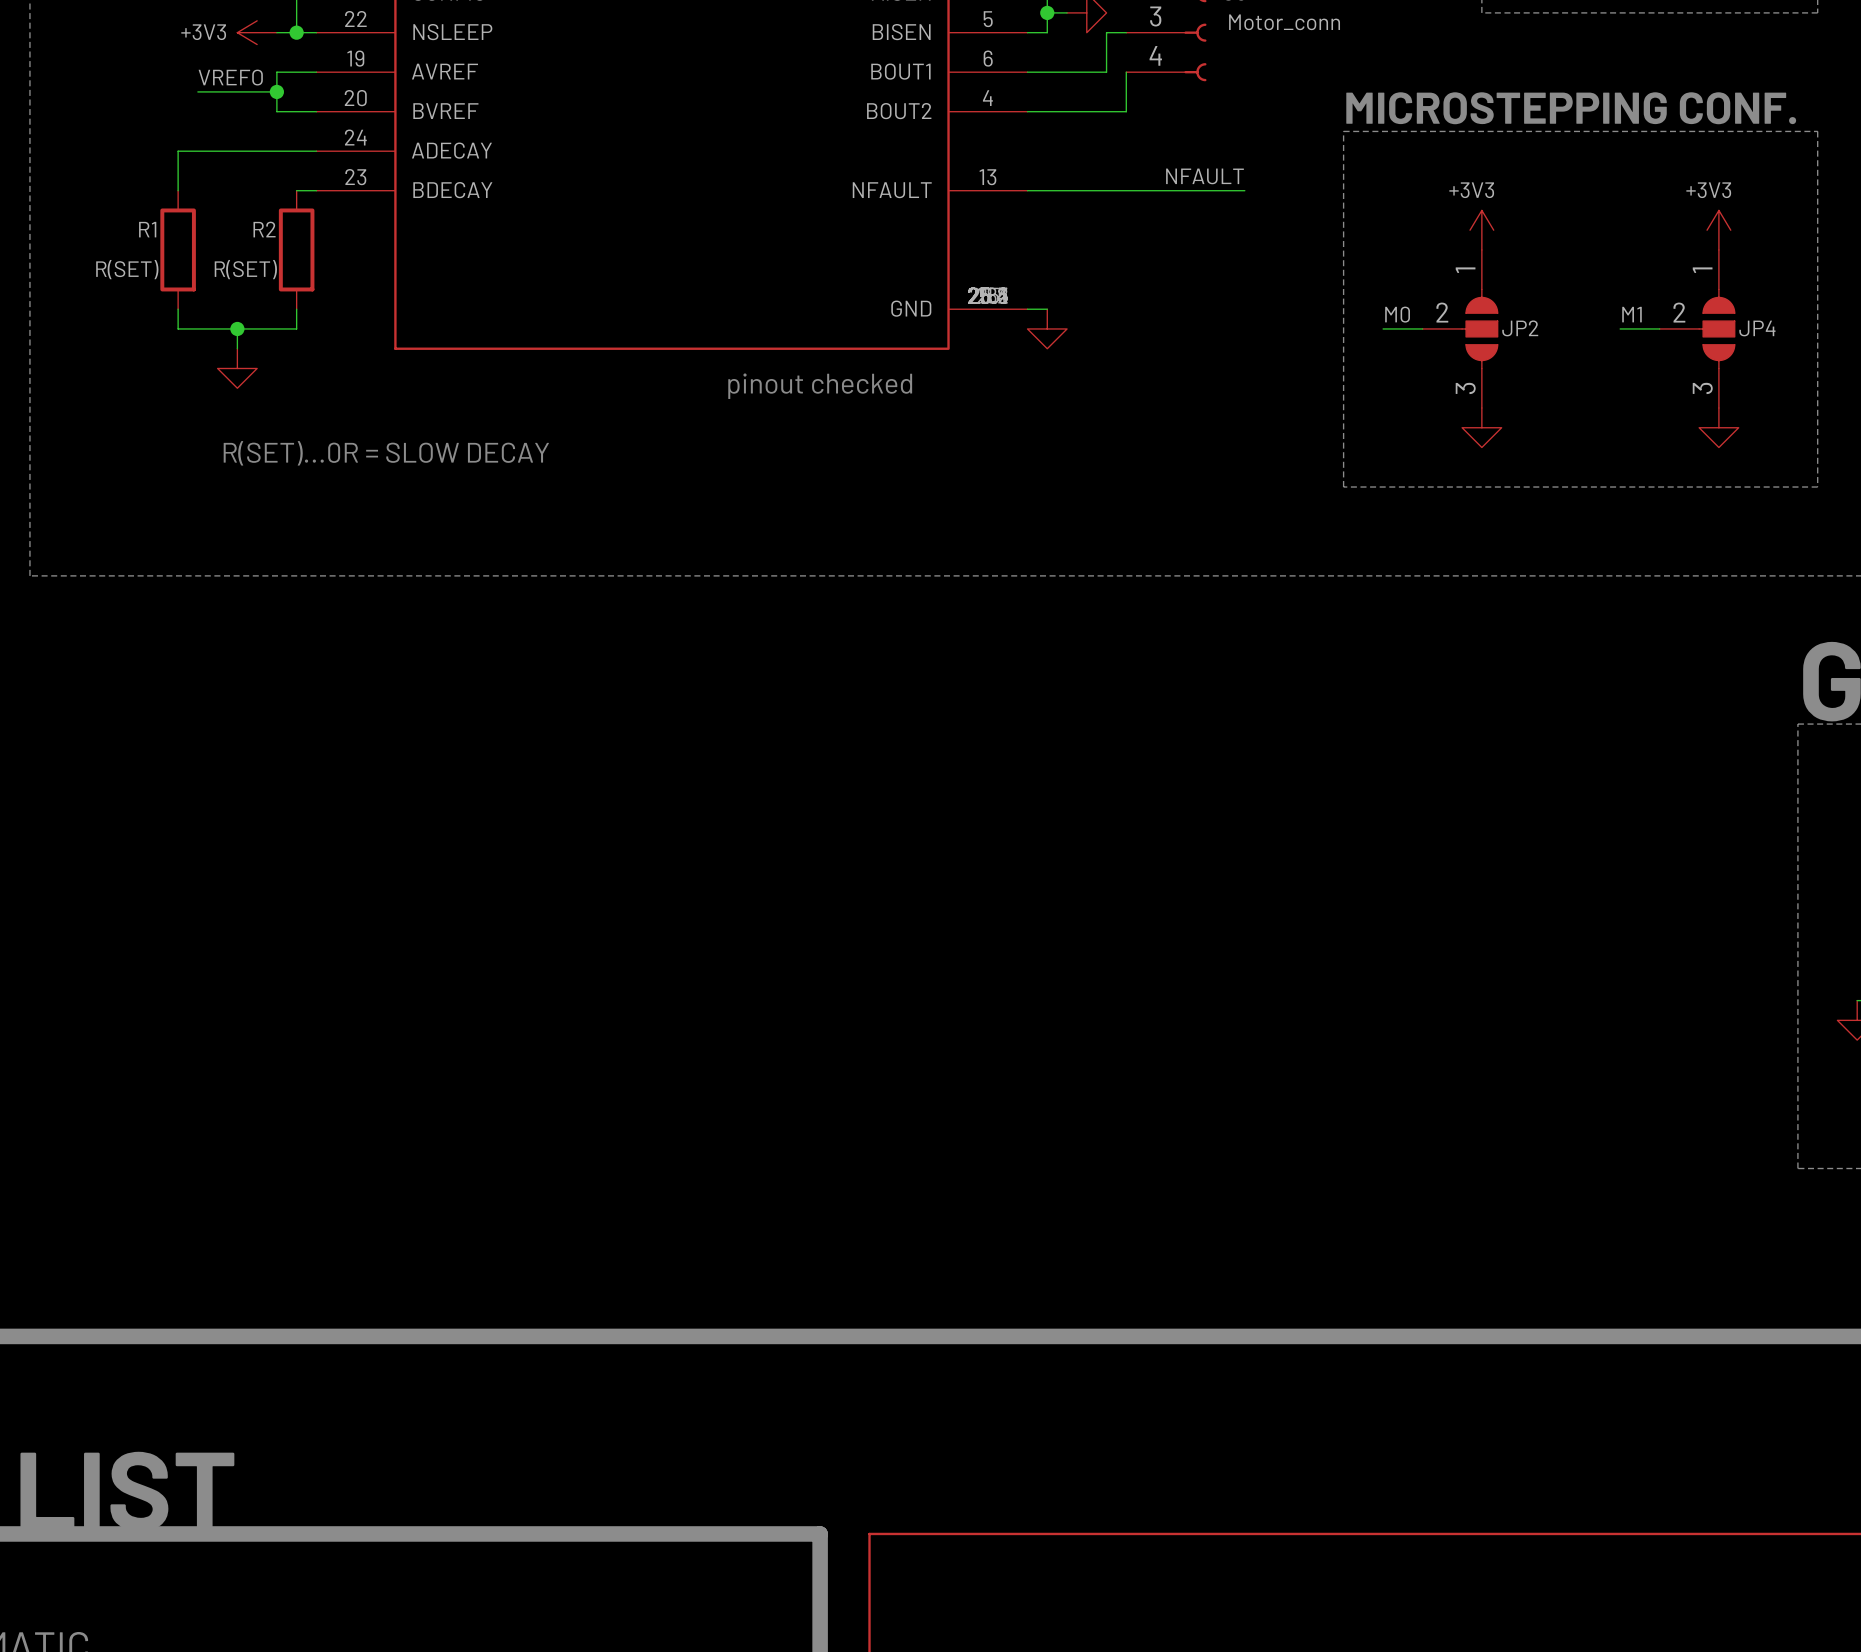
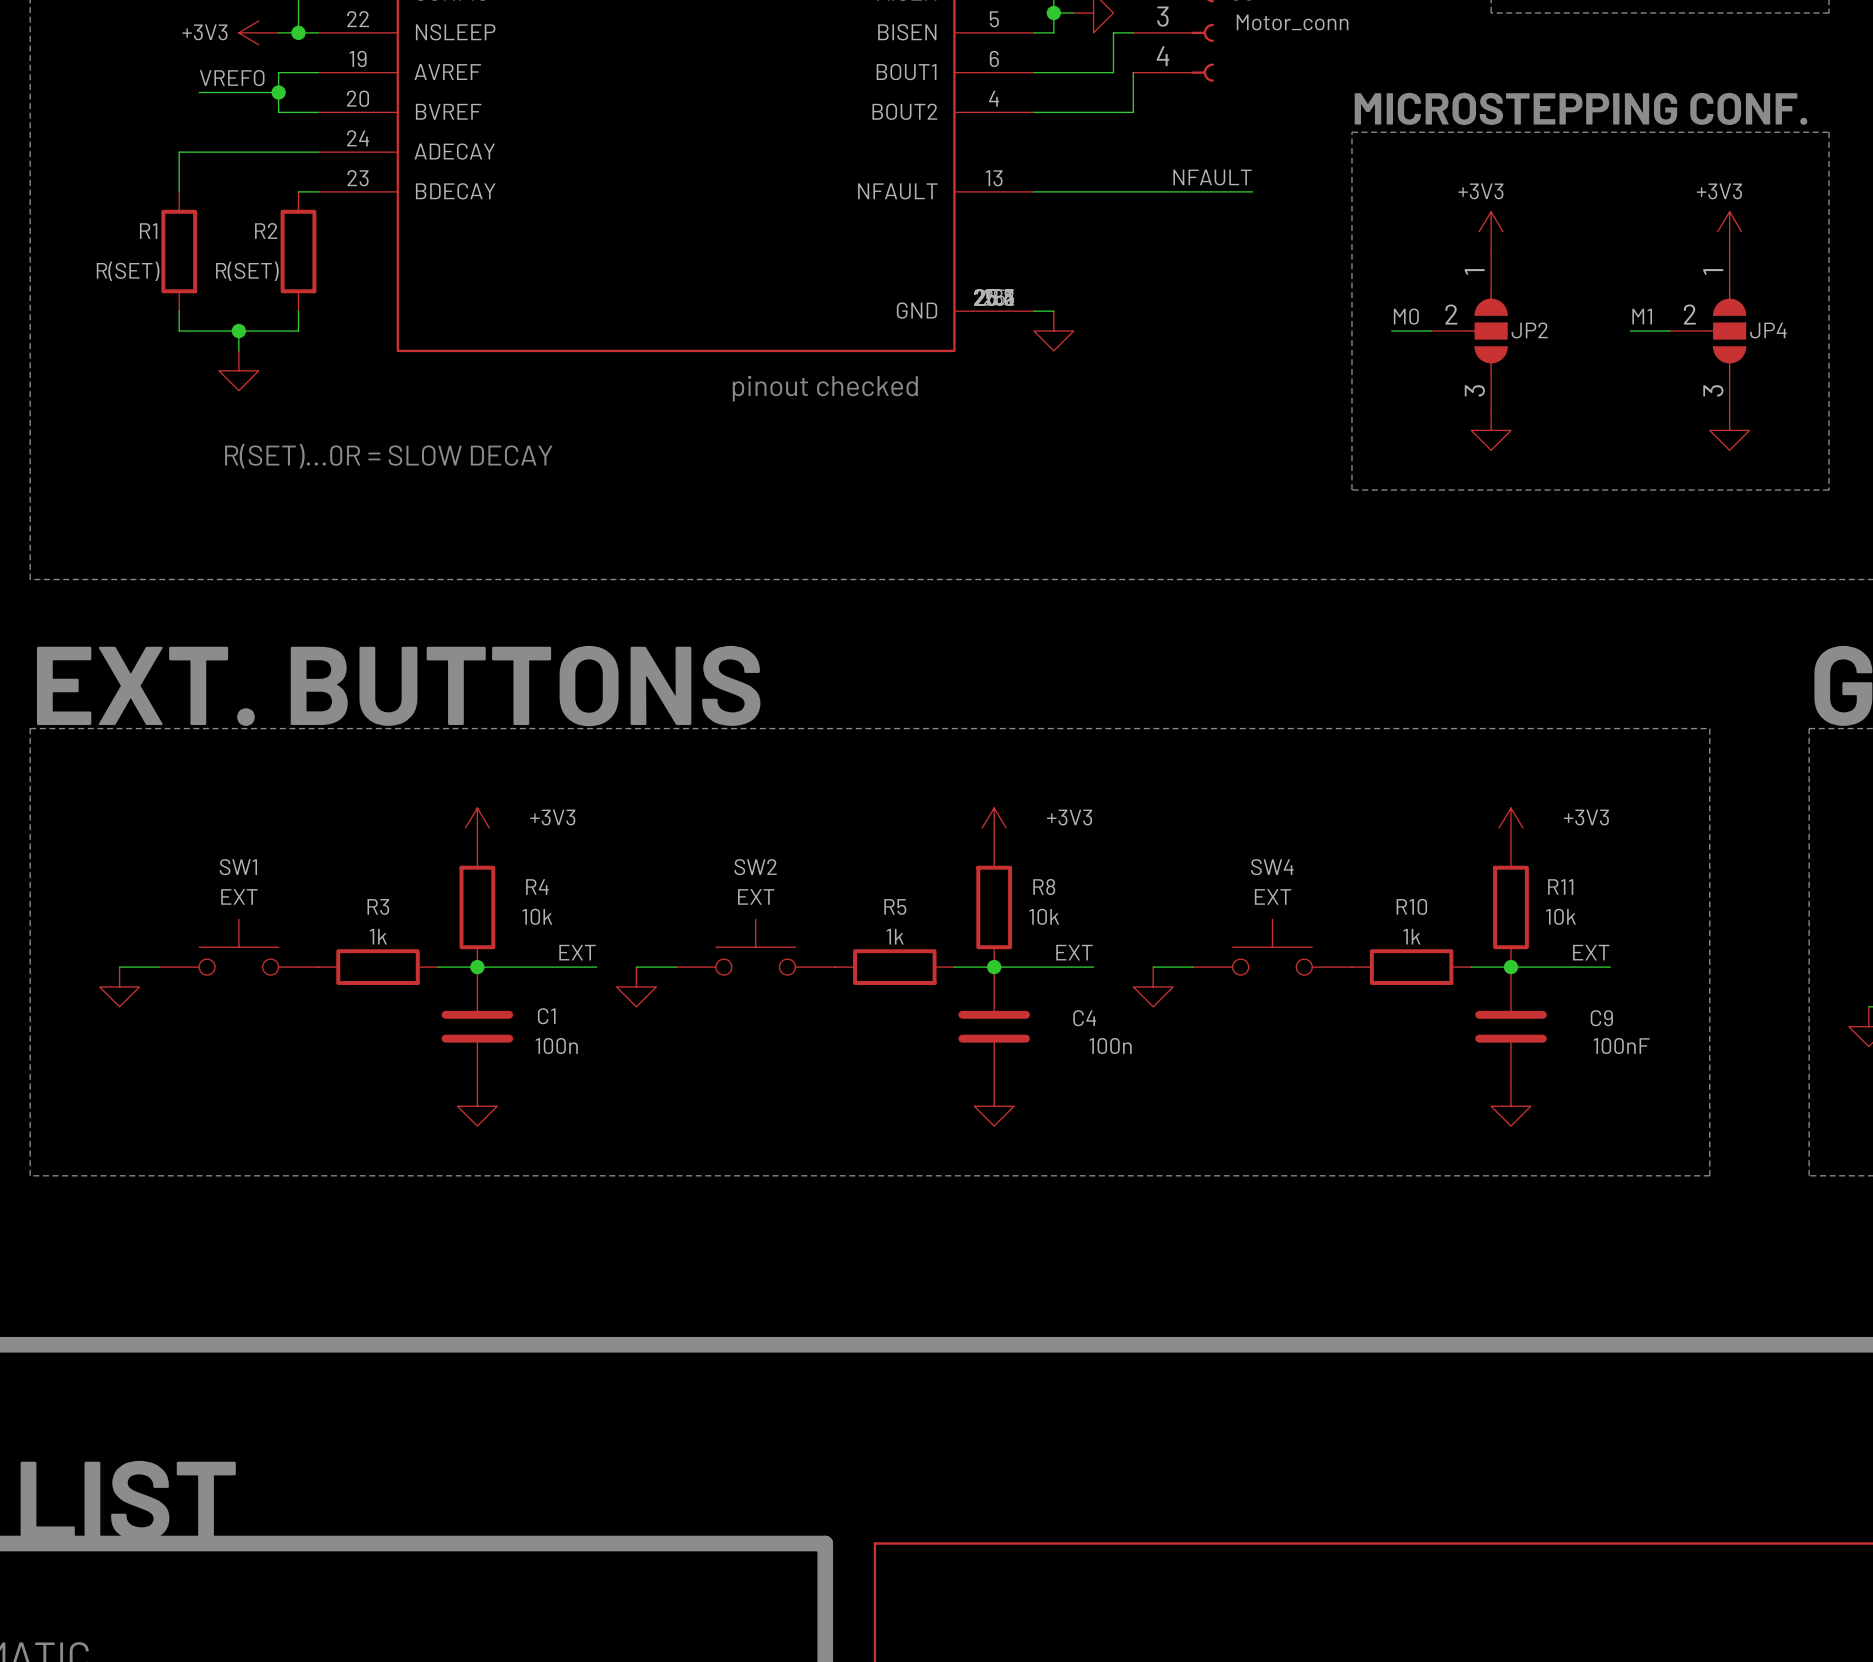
text: none -> EXT. BUTTONS (398, 686)
line: none -> (30, 728) (1709, 728) (1709, 1175) (30, 1175) (30, 728)
power symbol: none -> +3V3 (477, 827)
power symbol: none -> +3V3 (994, 827)
power symbol: none -> +3V3 (1510, 827)
R4: none -> 10k (477, 907)
R8: none -> 10k (994, 907)
R11: none -> 10k (1510, 907)
SW1: none -> EXT (238, 947)
SW2: none -> EXT (755, 947)
SW4: none -> EXT (1272, 947)
label: none -> EXT (577, 952)
label: none -> EXT (1074, 952)
label: none -> EXT (1591, 952)
wire: none -> (119, 967) (159, 967)
R3: none -> 1k (378, 967)
wire: none -> (437, 967) (596, 967)
junction: none -> (477, 967)
wire: none -> (636, 967) (676, 967)
R5: none -> 1k (894, 967)
wire: none -> (954, 967) (1093, 967)
junction: none -> (994, 967)
wire: none -> (1153, 967) (1192, 967)
R10: none -> 1k (1411, 967)
wire: none -> (1471, 967) (1610, 967)
junction: none -> (1510, 967)
power symbol: none -> (119, 986)
power symbol: none -> (636, 986)
power symbol: none -> (1153, 986)
C1: none -> 100n (477, 1026)
C4: none -> 100n (994, 1026)
C9: none -> 100nF (1510, 1026)
power symbol: none -> (477, 1106)
power symbol: none -> (994, 1106)
power symbol: none -> (1510, 1106)

